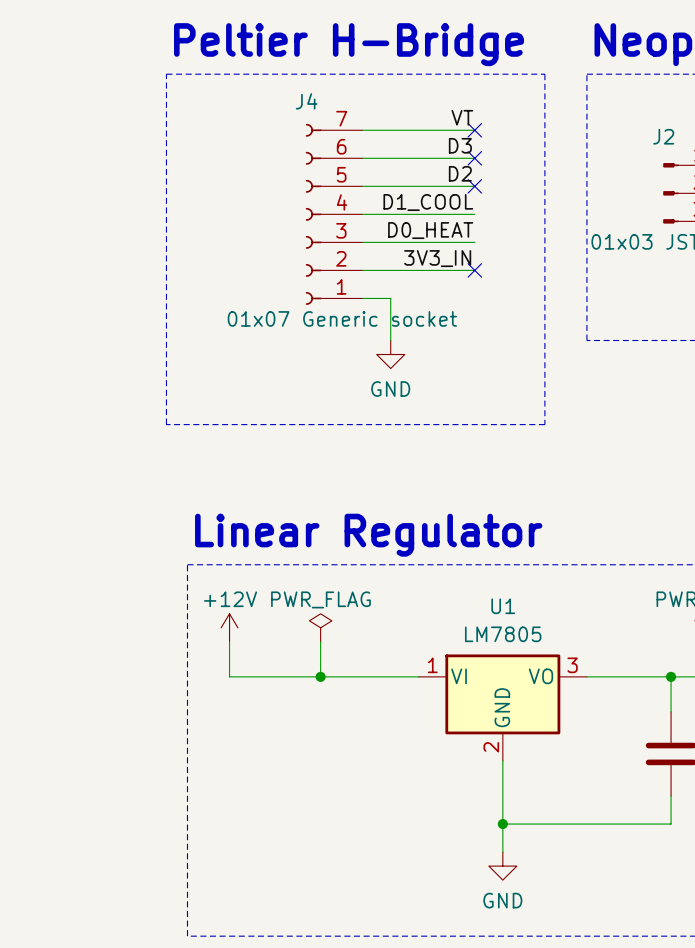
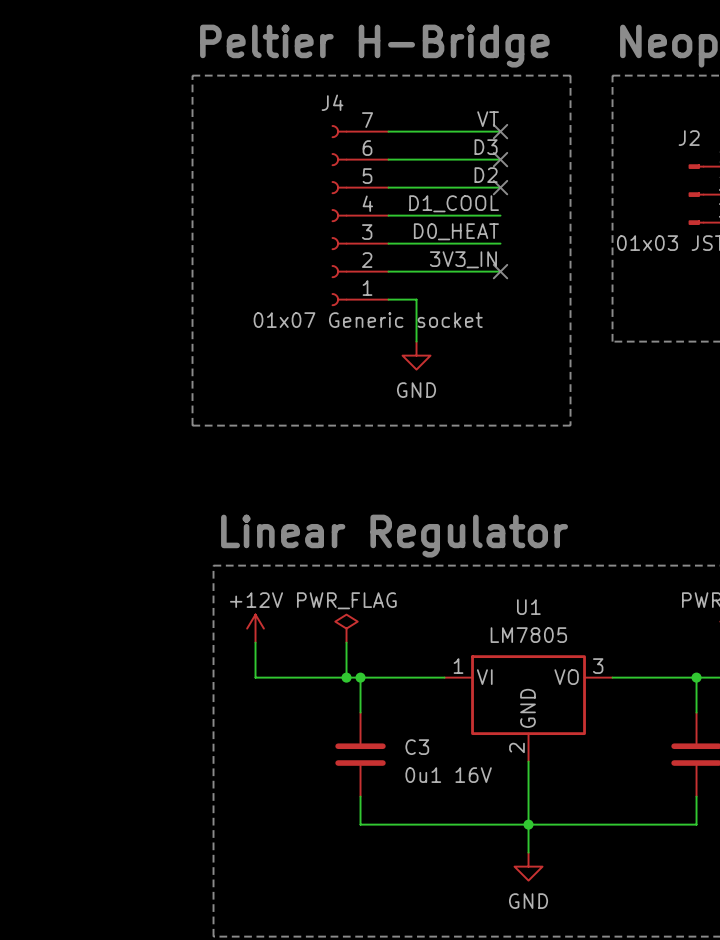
wire: none -> (360, 677) (360, 712)
junction: none -> (360, 677)
C3: none -> 0u1 16V (360, 754)
wire: none -> (360, 796) (360, 824) (528, 824)

